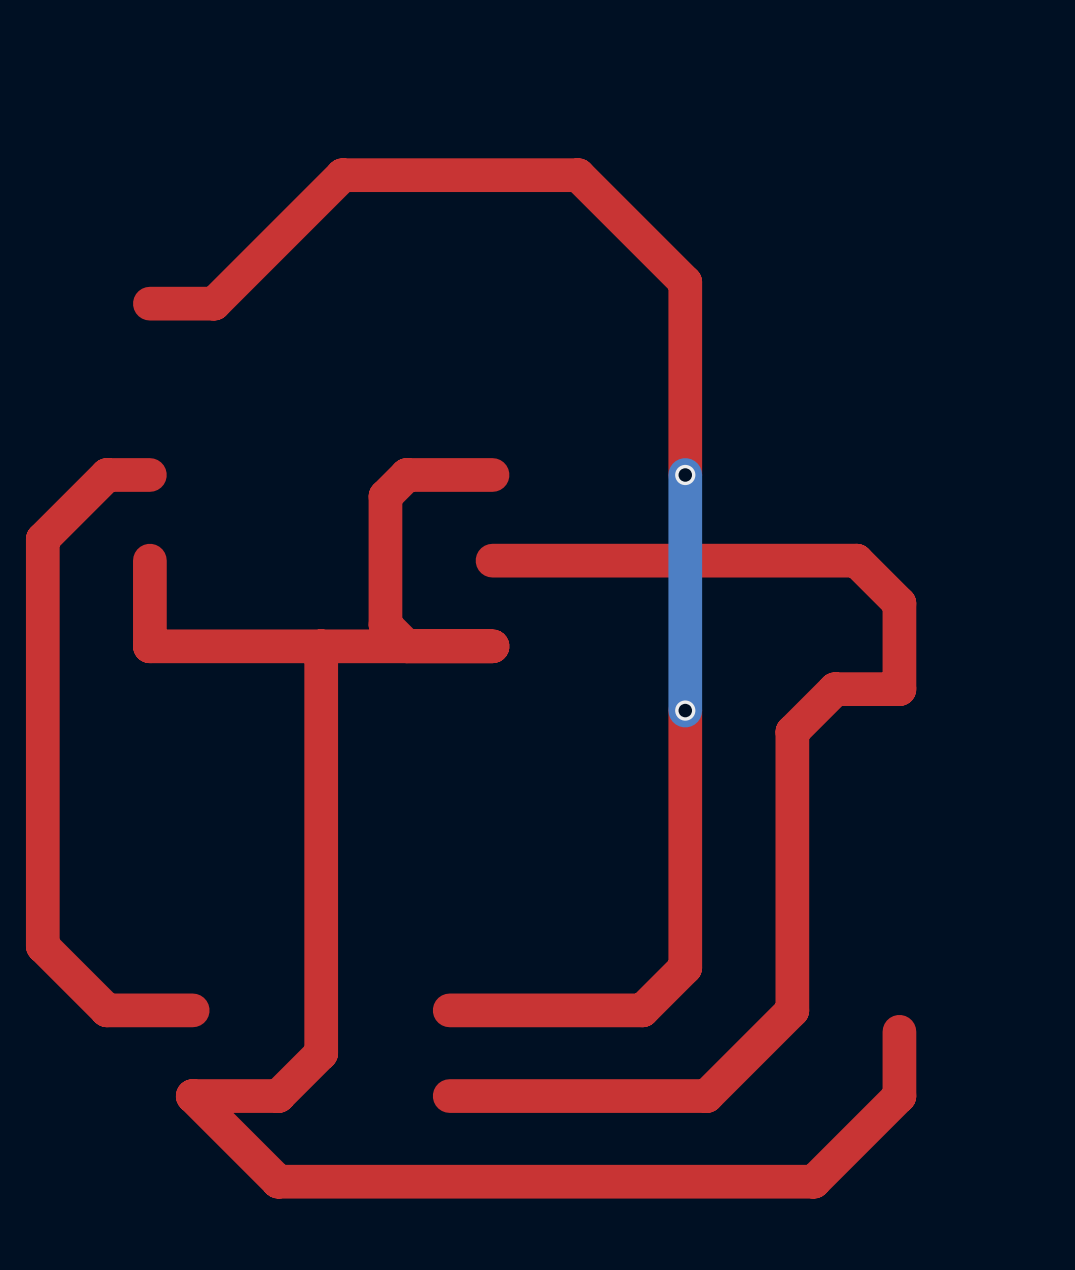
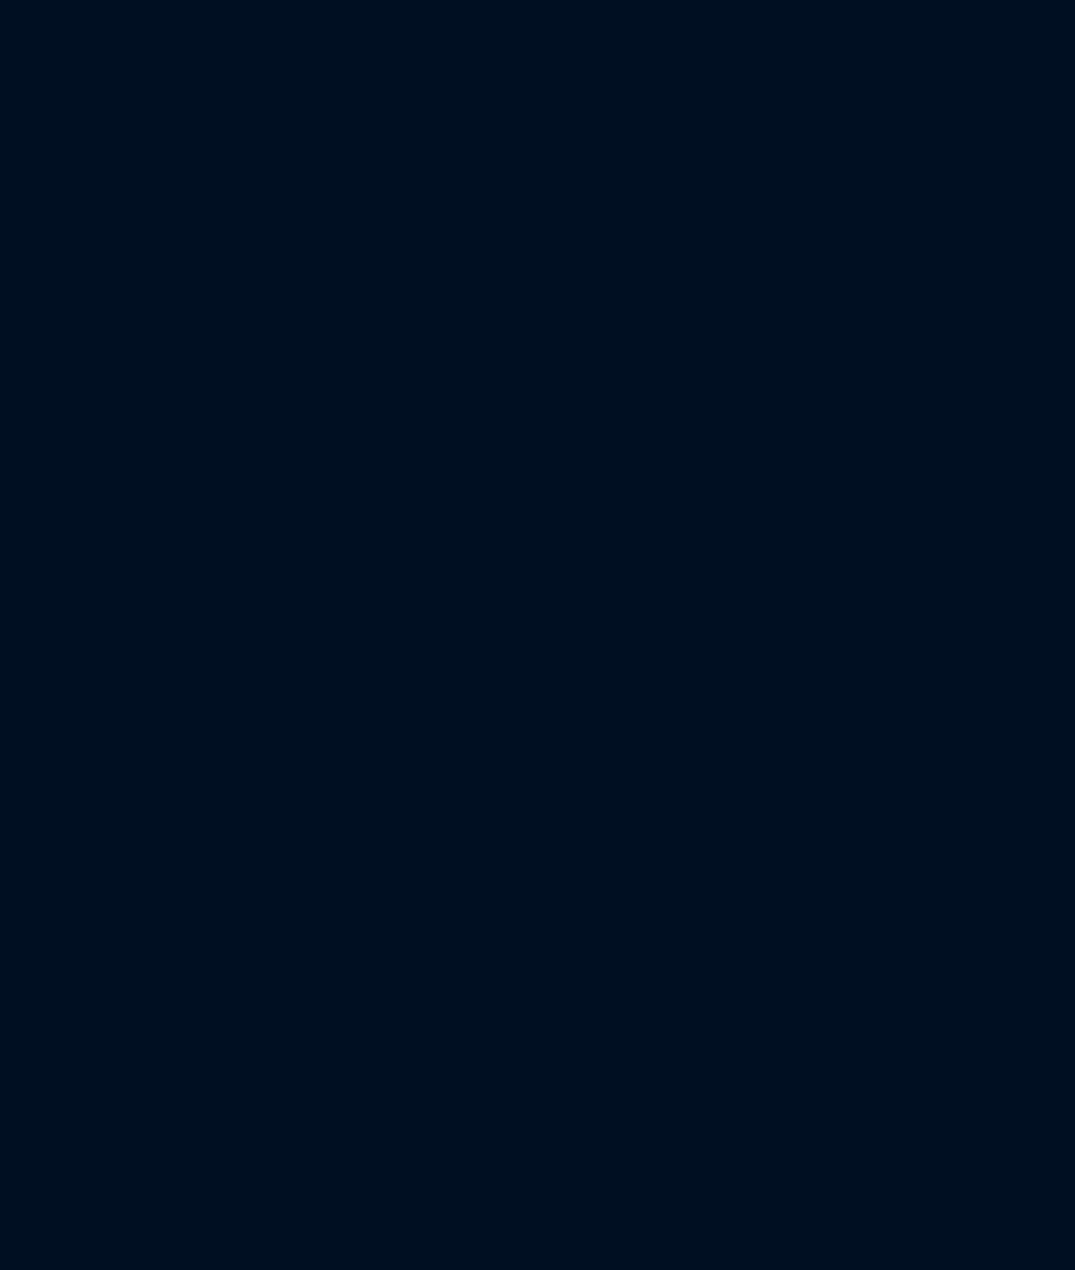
top track: (149, 303) (214, 303) (342, 175) (578, 175) (685, 282) (685, 474) -> none
top track: (149, 474) (107, 474) (42, 539) (42, 946) (107, 1010) (192, 1010) -> none
top track: (492, 474) (406, 474) (385, 496) (385, 624) (406, 646) -> none
bottom track: (685, 474) (685, 710) -> none
via: (685, 474) -> none
top track: (149, 560) (149, 646) (492, 646) -> none
top track: (492, 560) (856, 560) (899, 603) (899, 689) (835, 689) (792, 731) (792, 1010) (706, 1096) (449, 1096) -> none
top track: (321, 646) (321, 1053) (278, 1096) (192, 1096) (278, 1181) (813, 1181) (899, 1096) (899, 1031) -> none
top track: (685, 710) (685, 967) (642, 1010) (449, 1010) -> none
via: (685, 710) -> none

